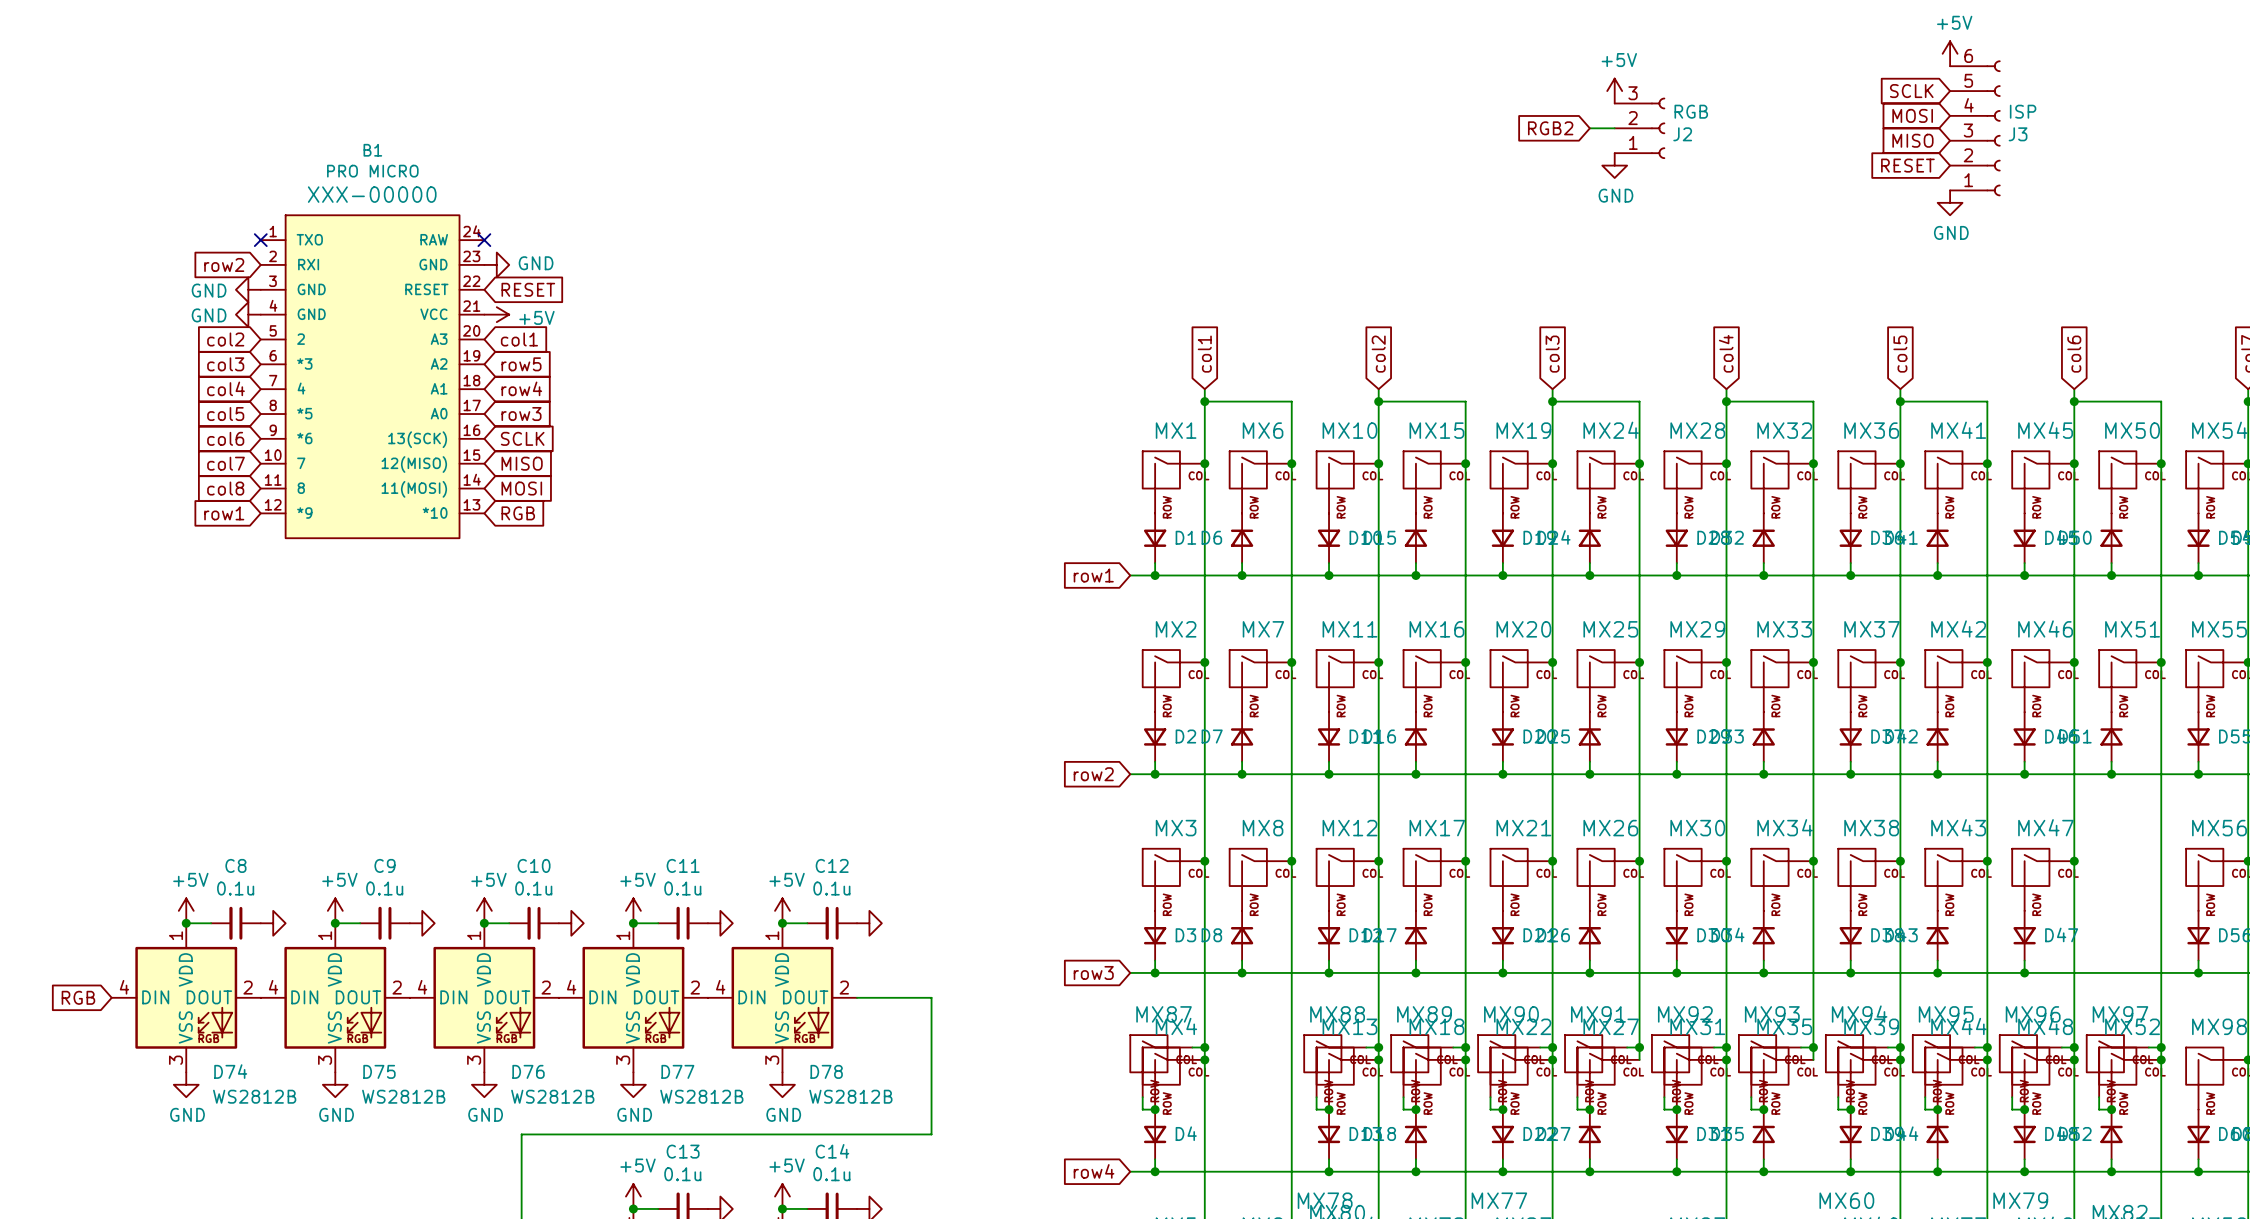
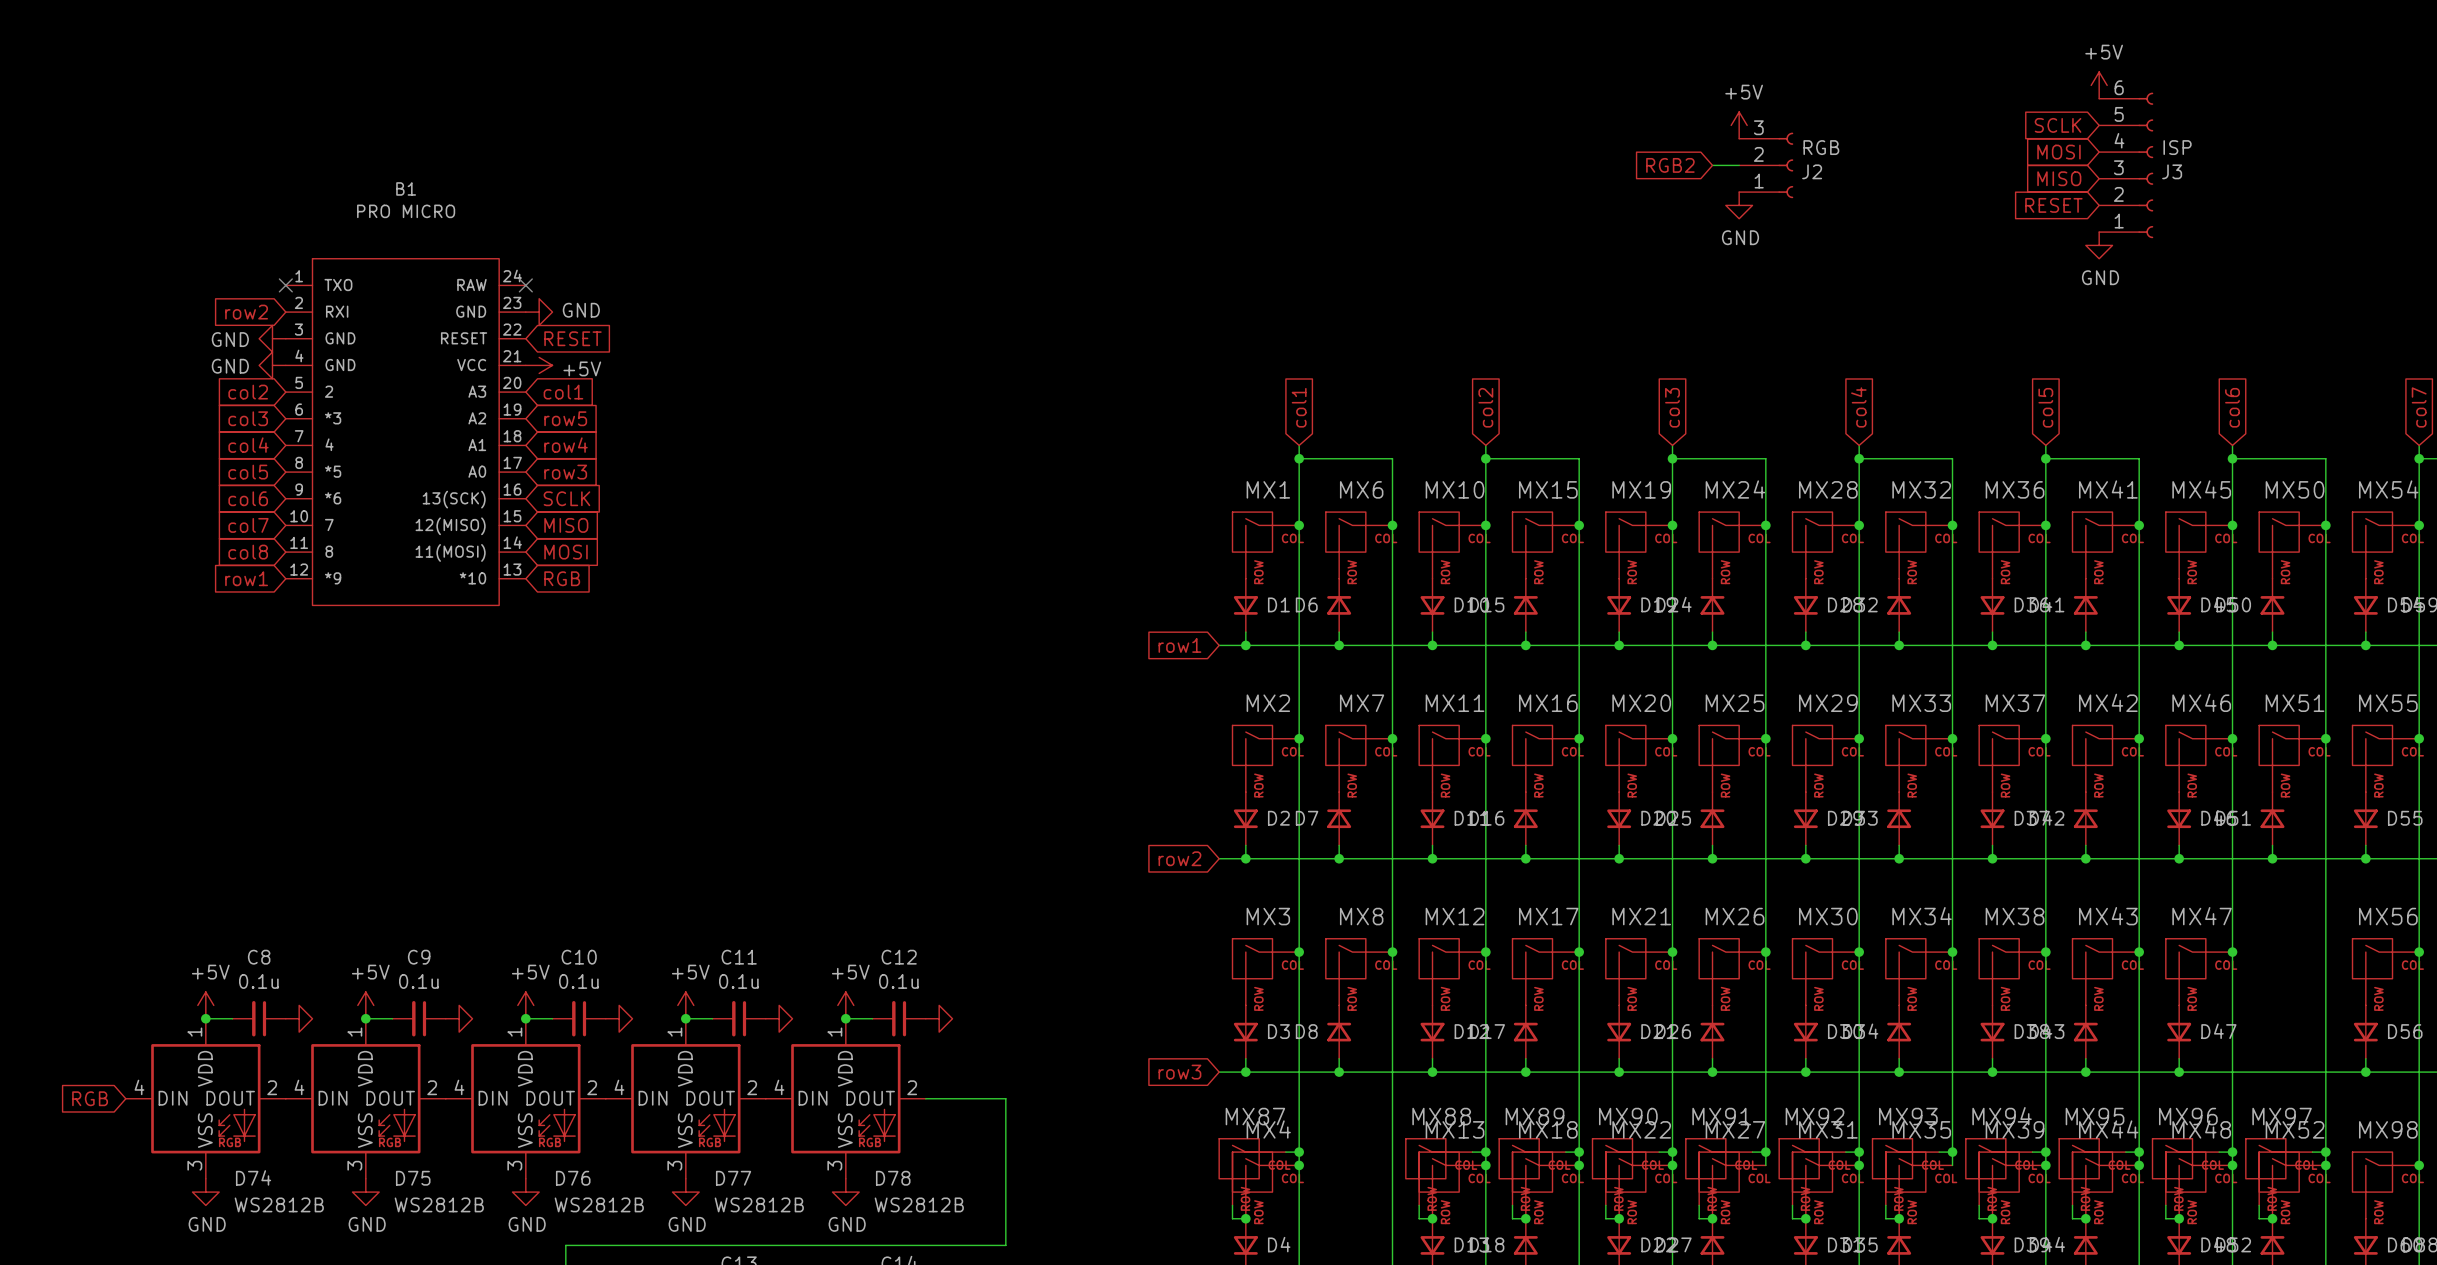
B1 text: XXX-00000 (372, 194) -> none

